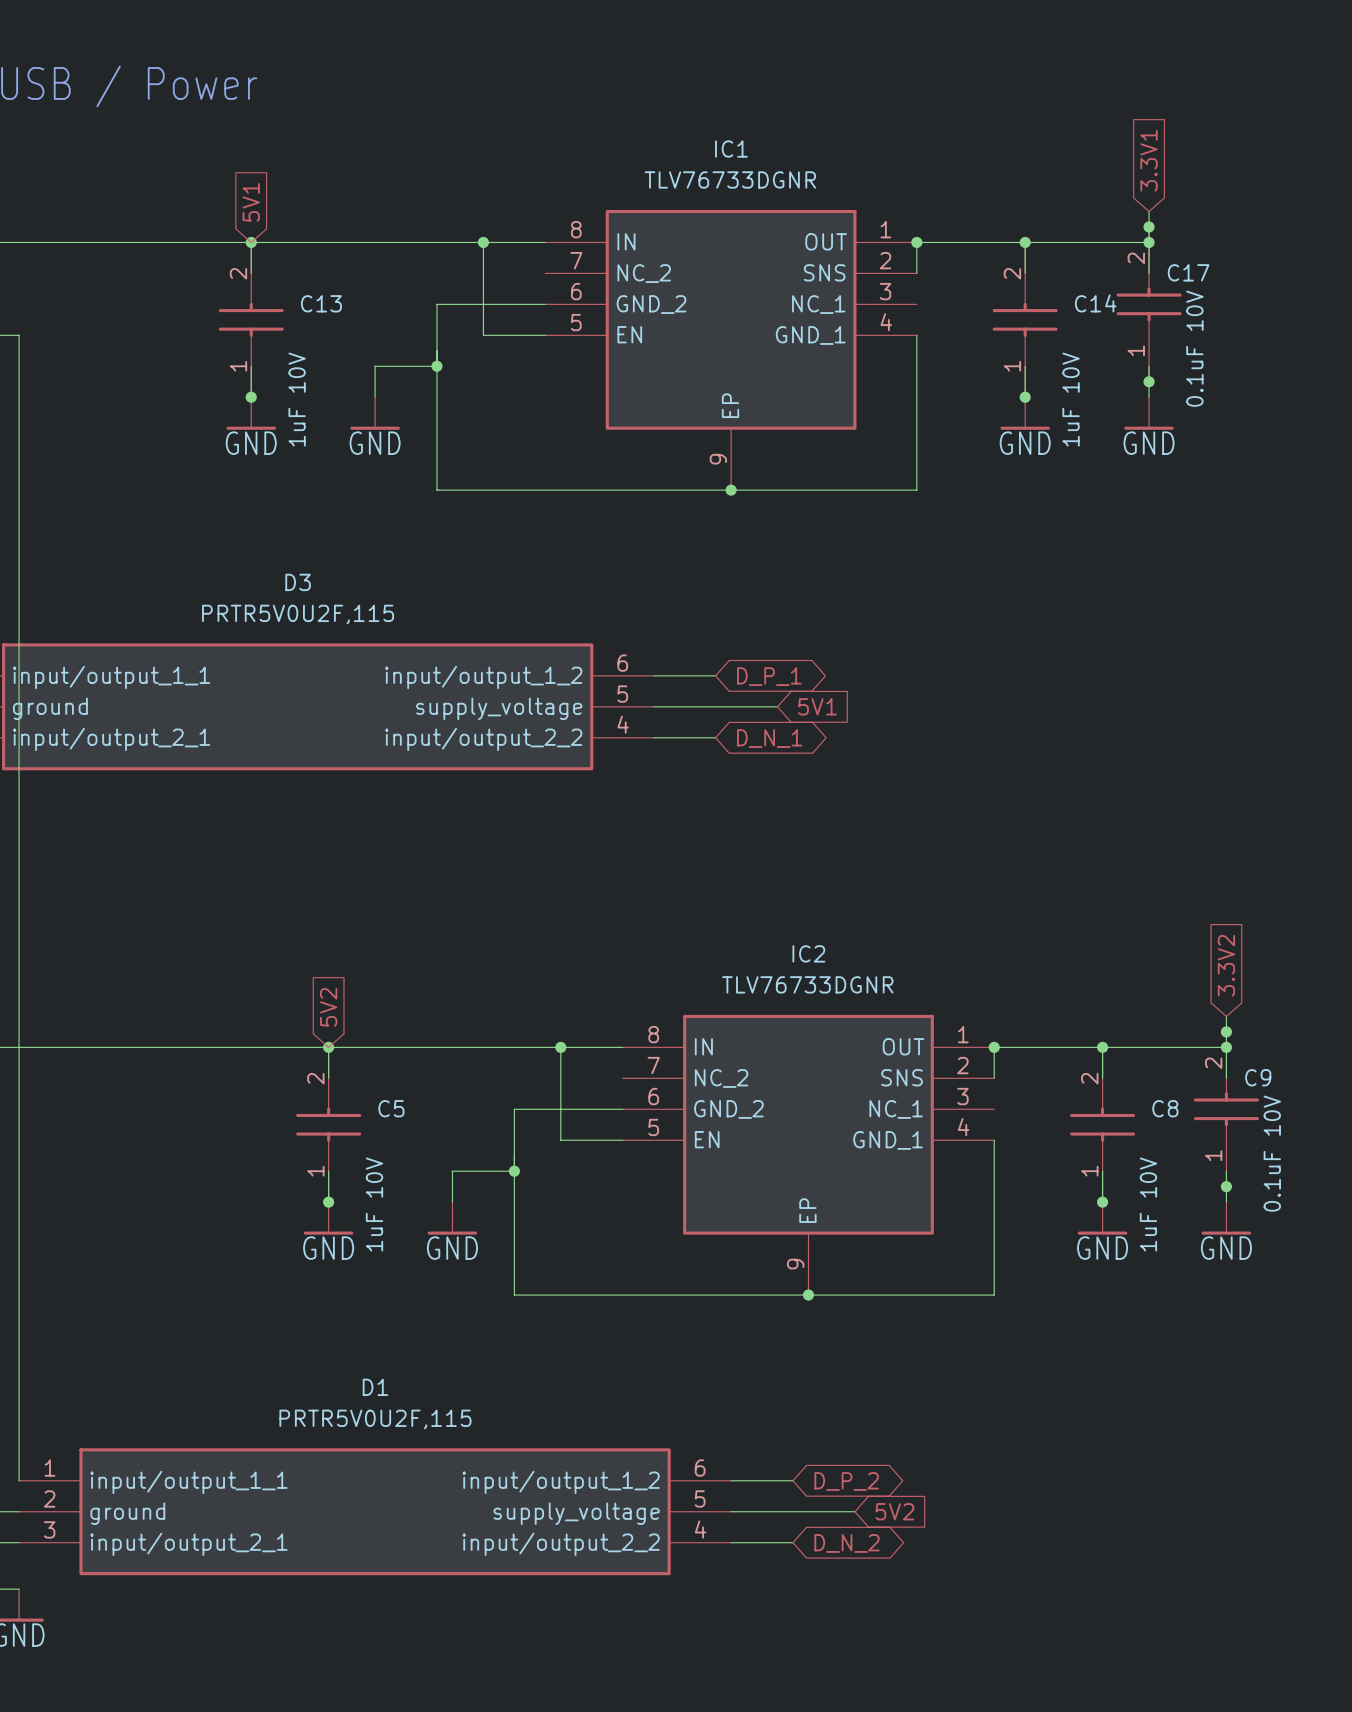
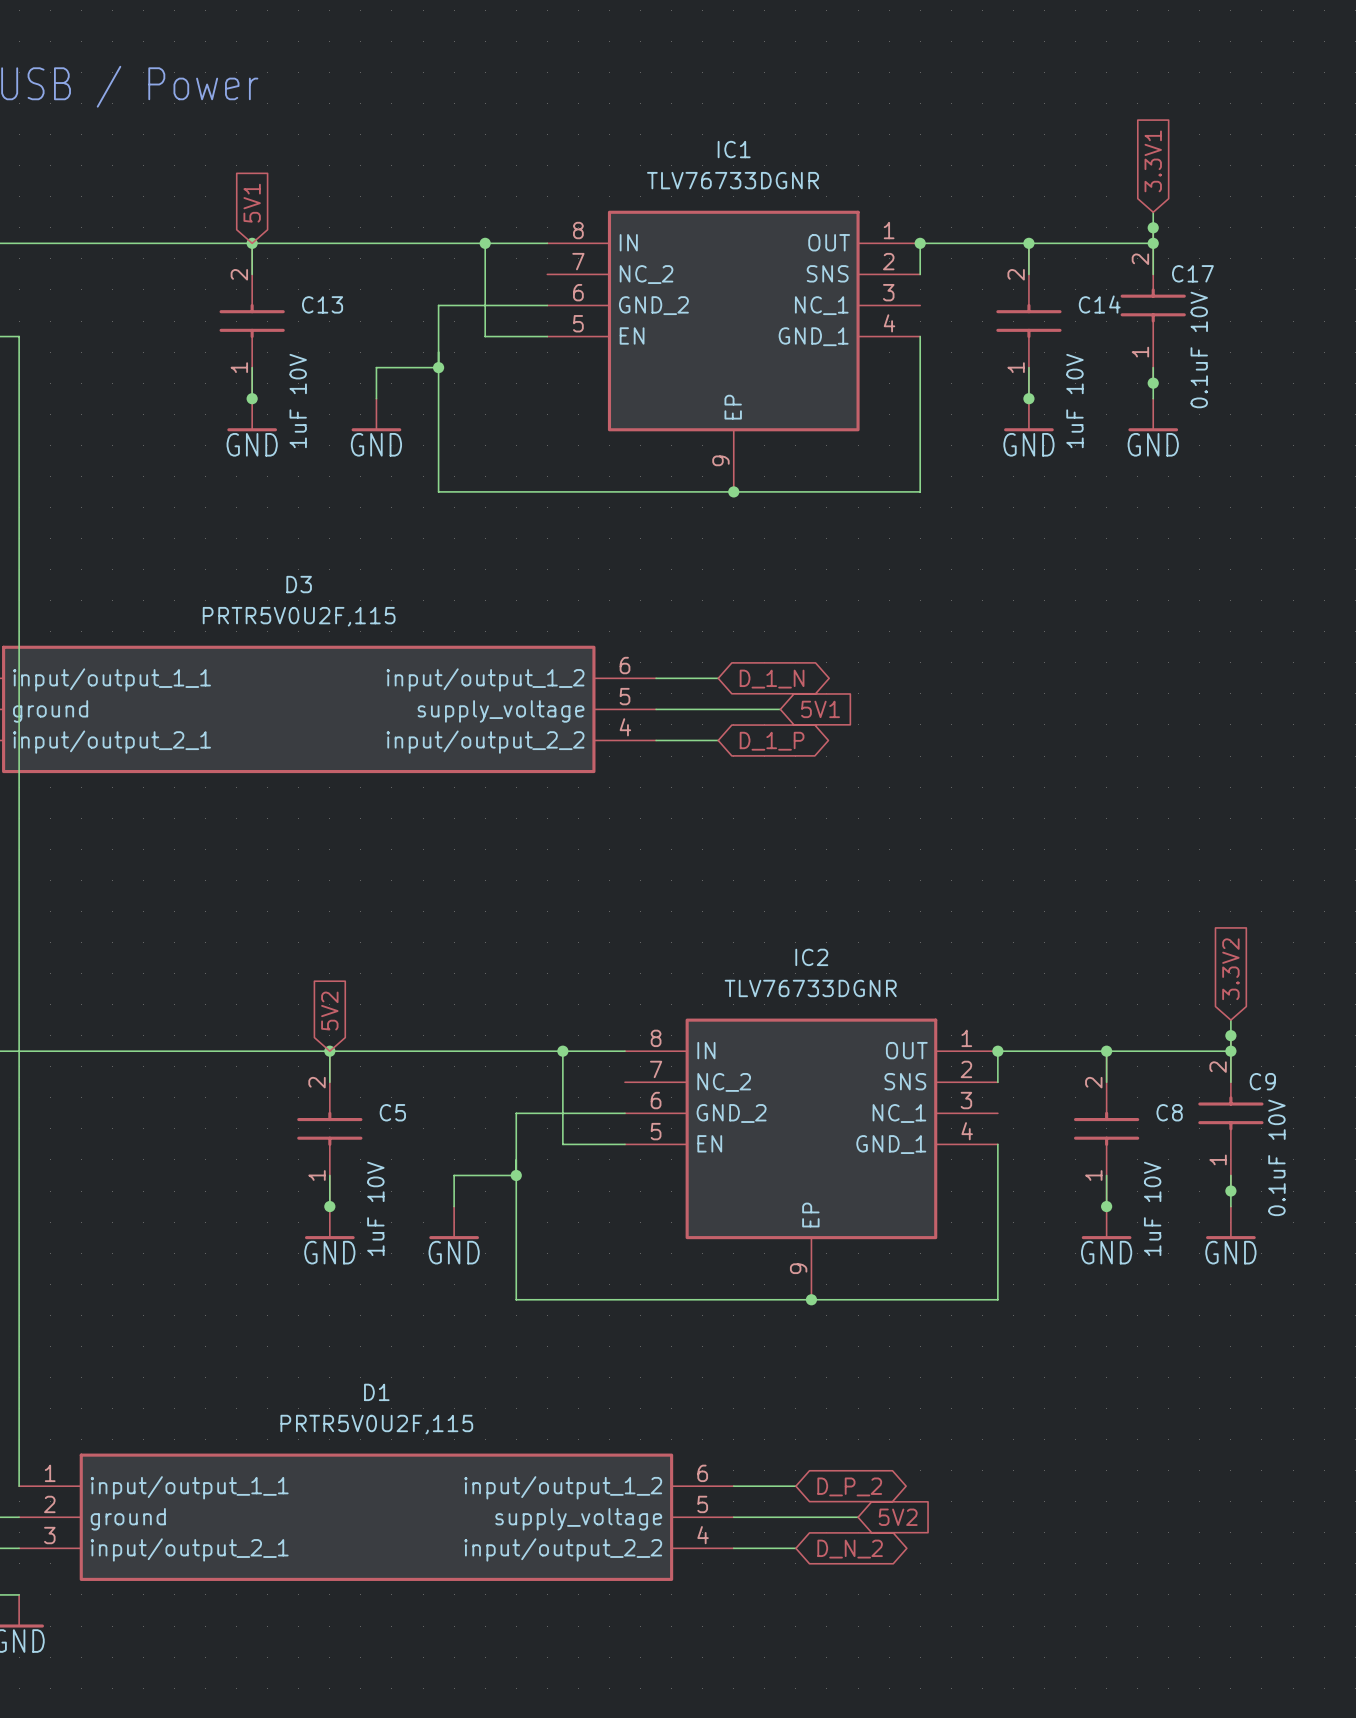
global label: D_P_1 (769, 676) -> D_1_N (772, 679)
global label: D_N_1 (769, 738) -> D_1_P (772, 741)

